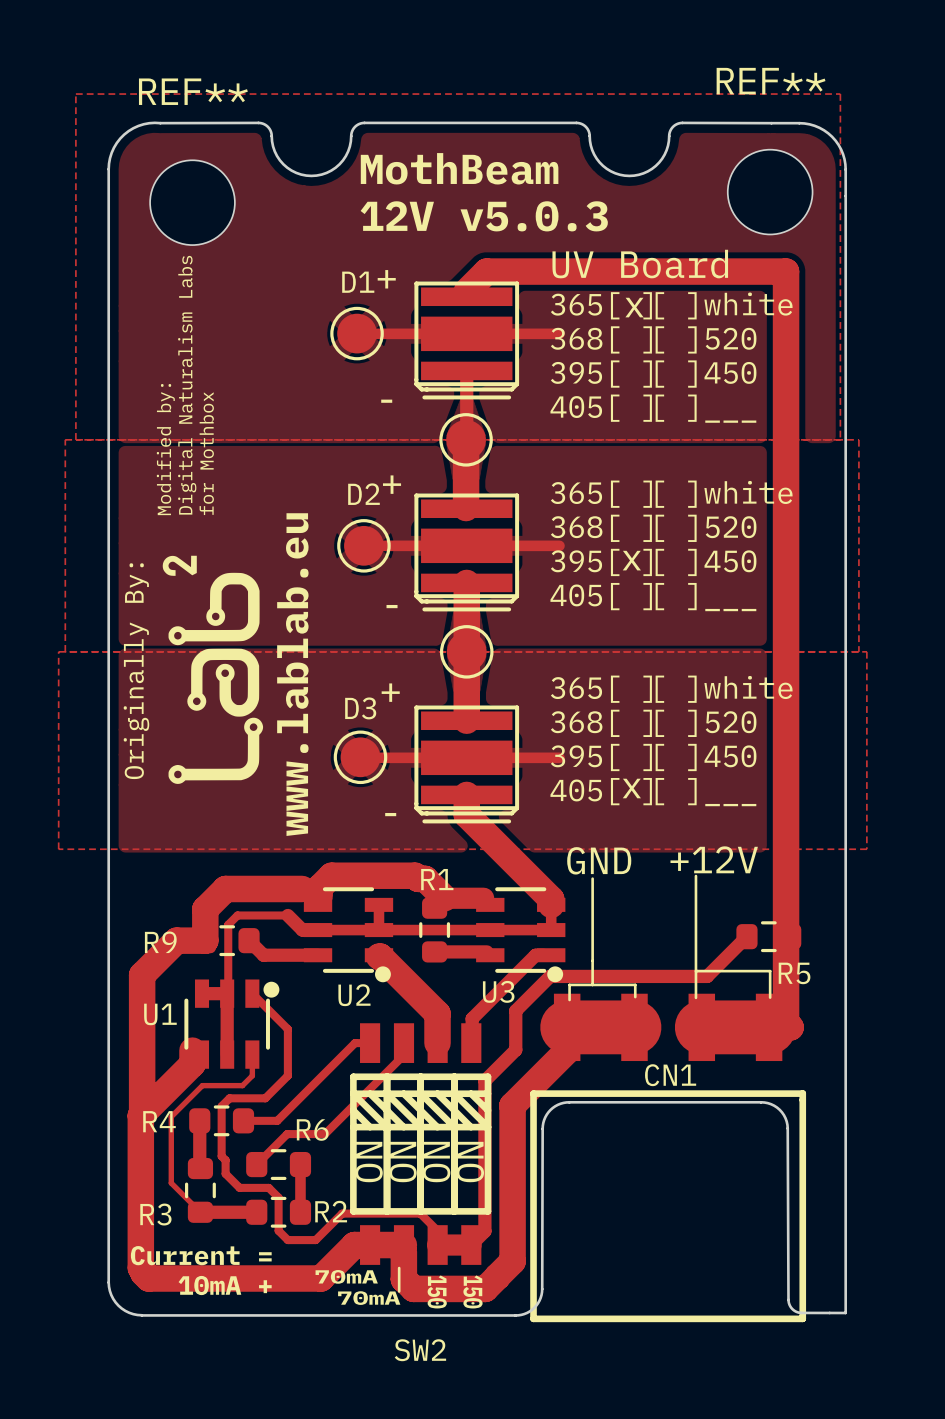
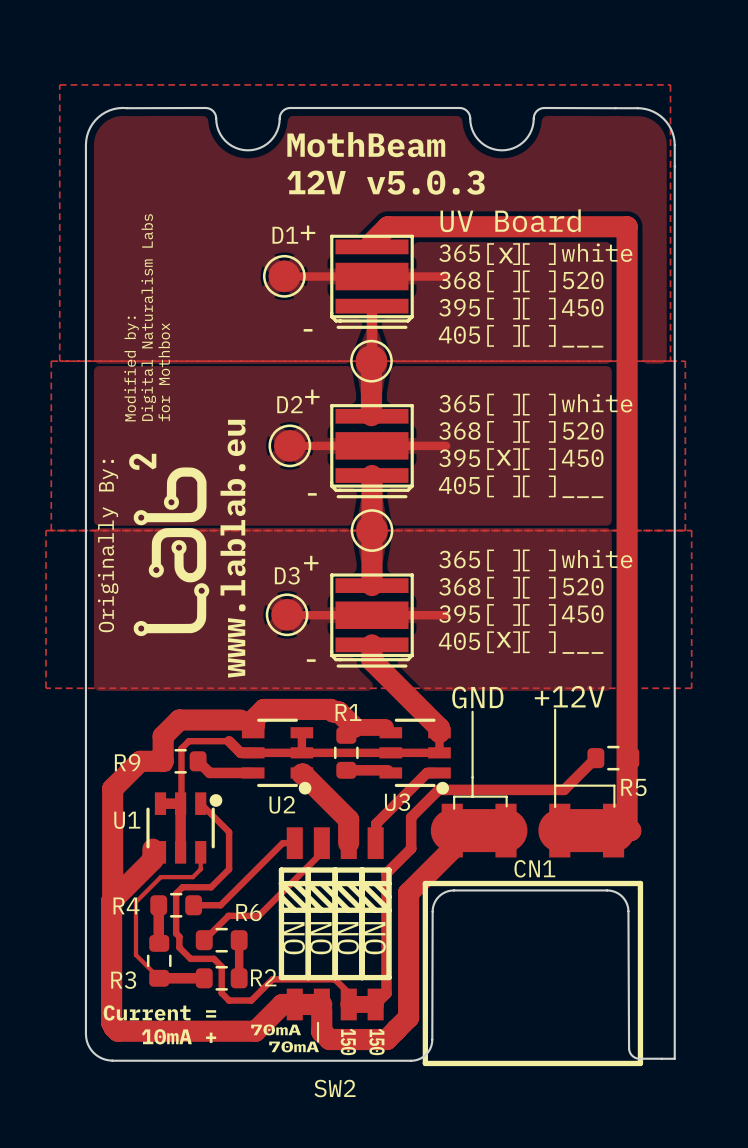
REF**: (770, 192) -> none
REF**: (192, 202) -> none

